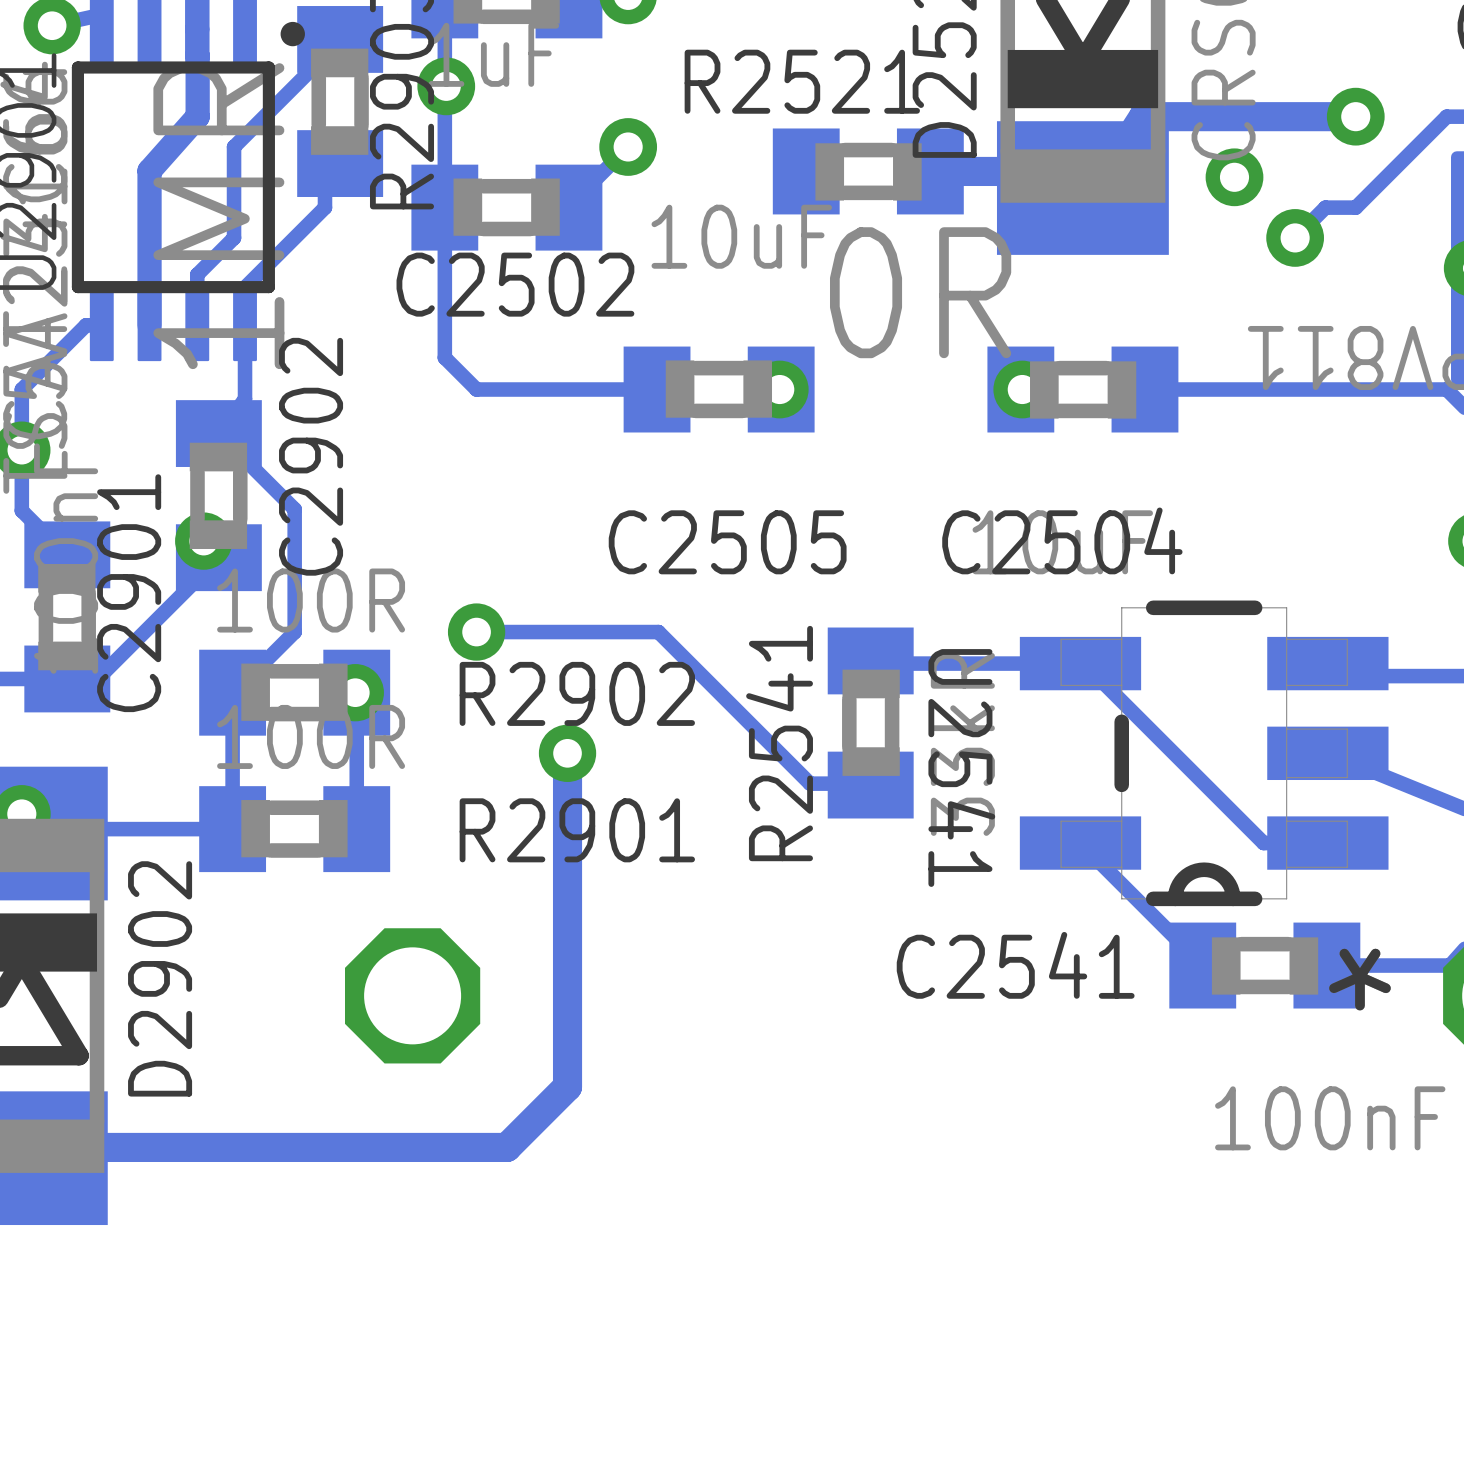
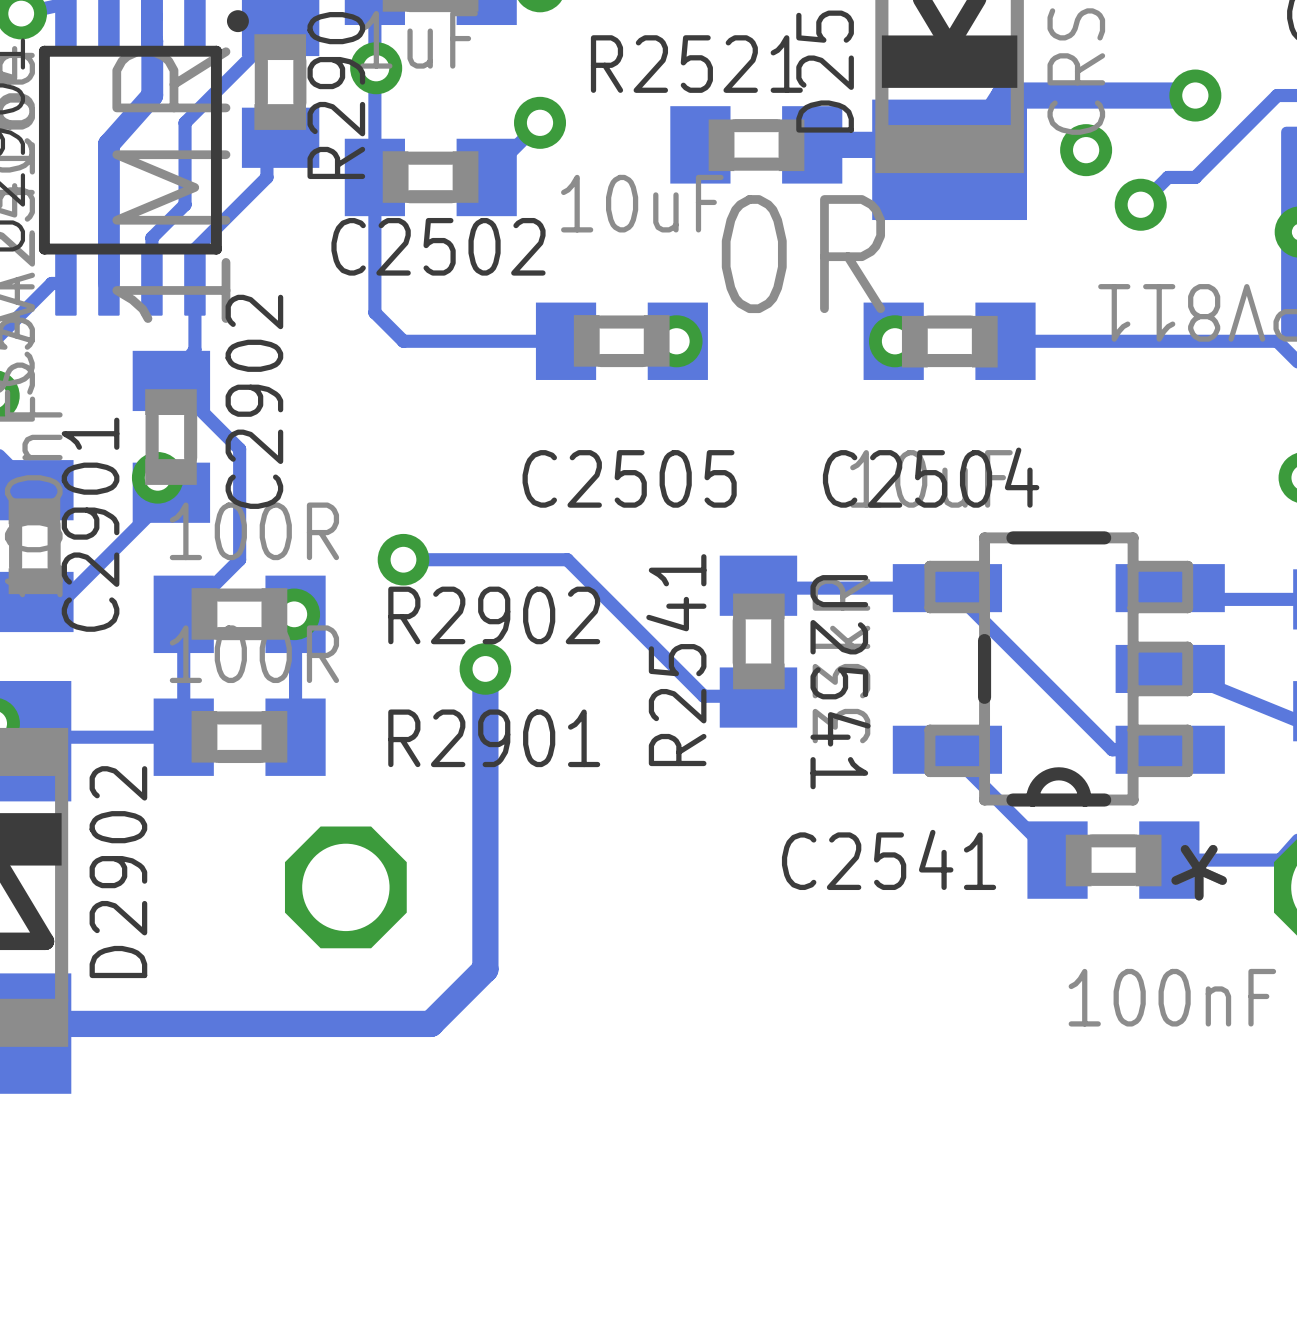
U2541 footprint: [1019, 600, 1389, 907] -> [892, 531, 1225, 807]

